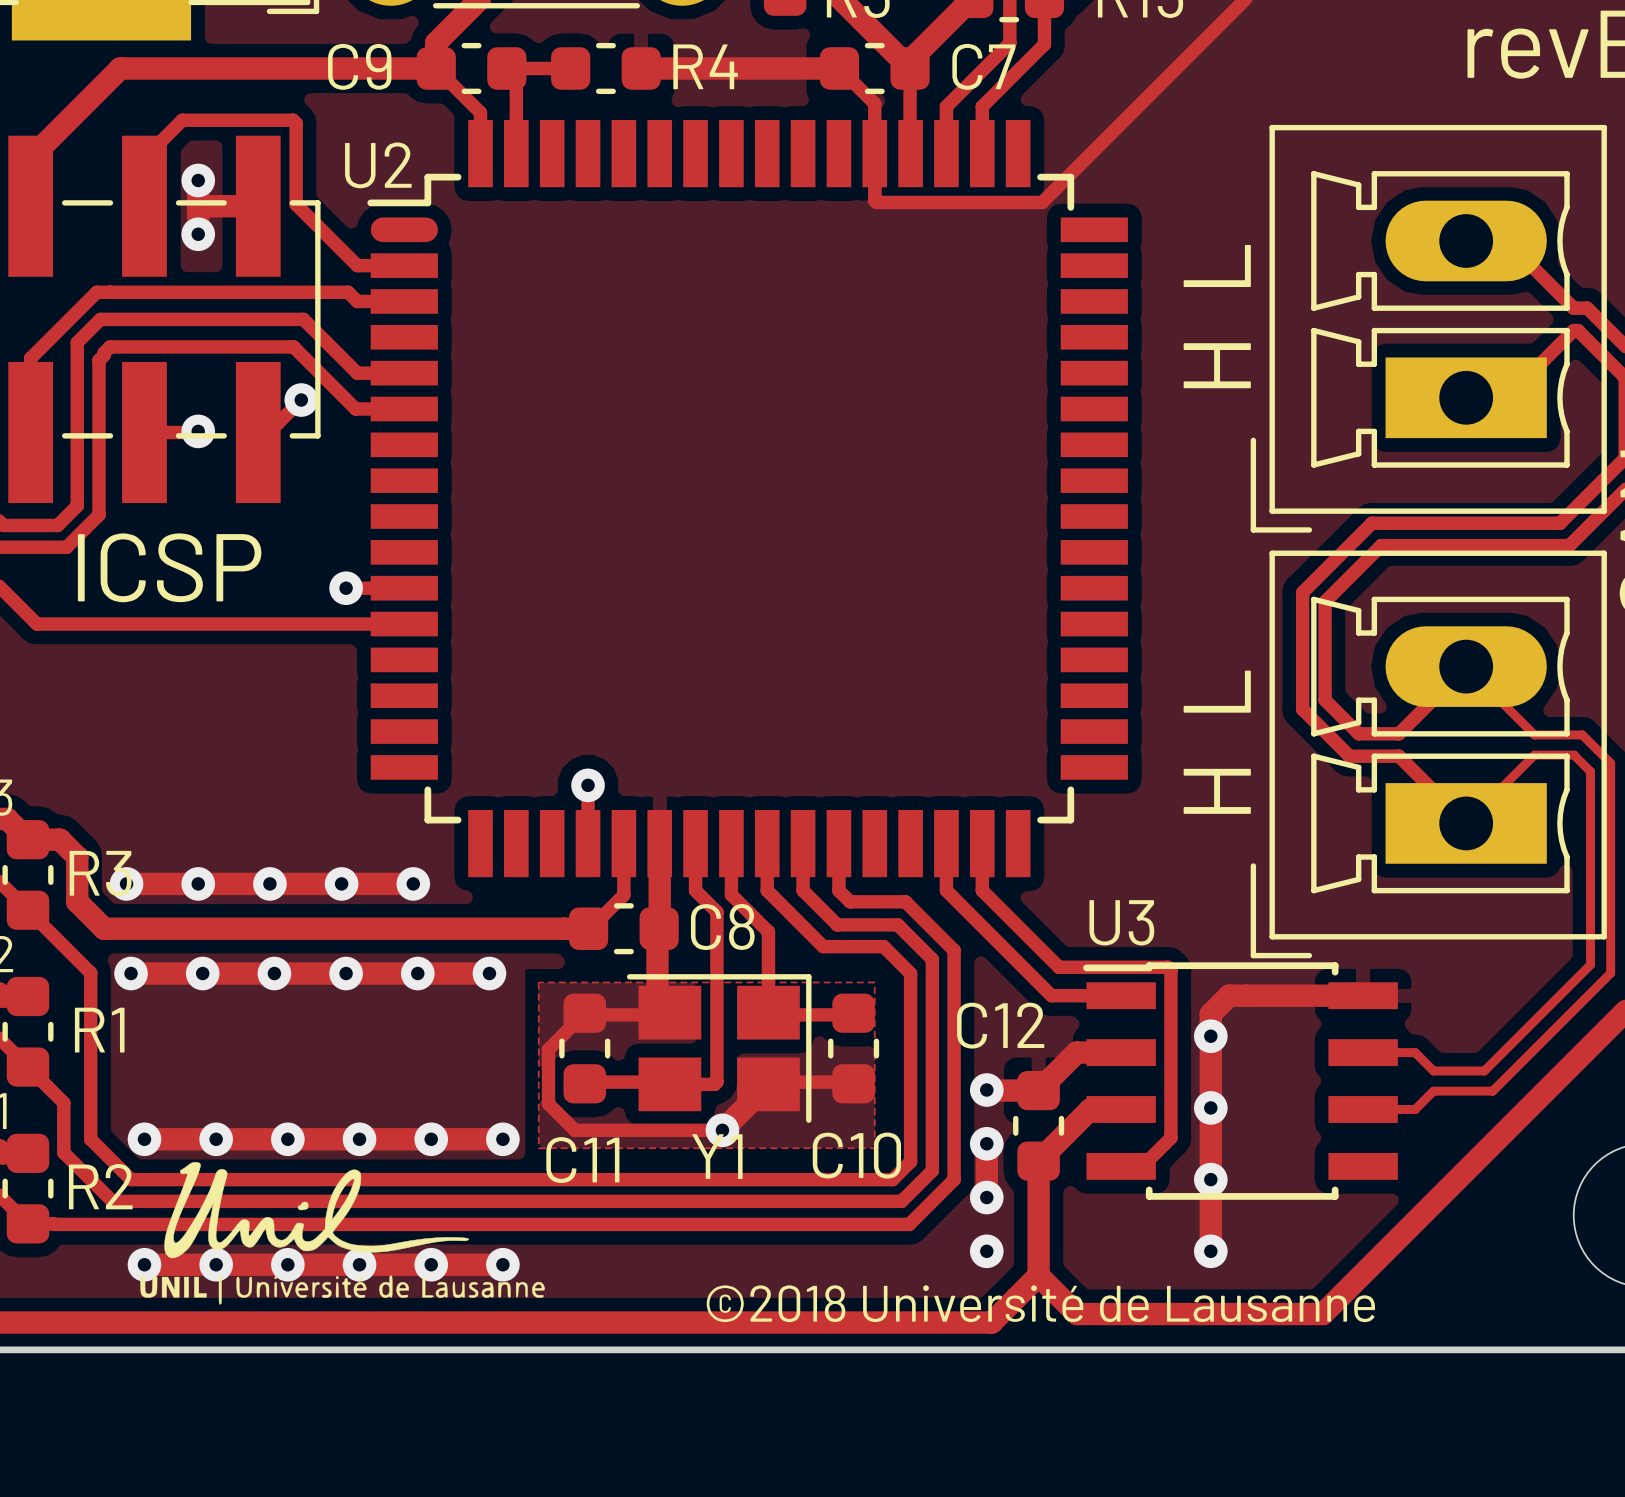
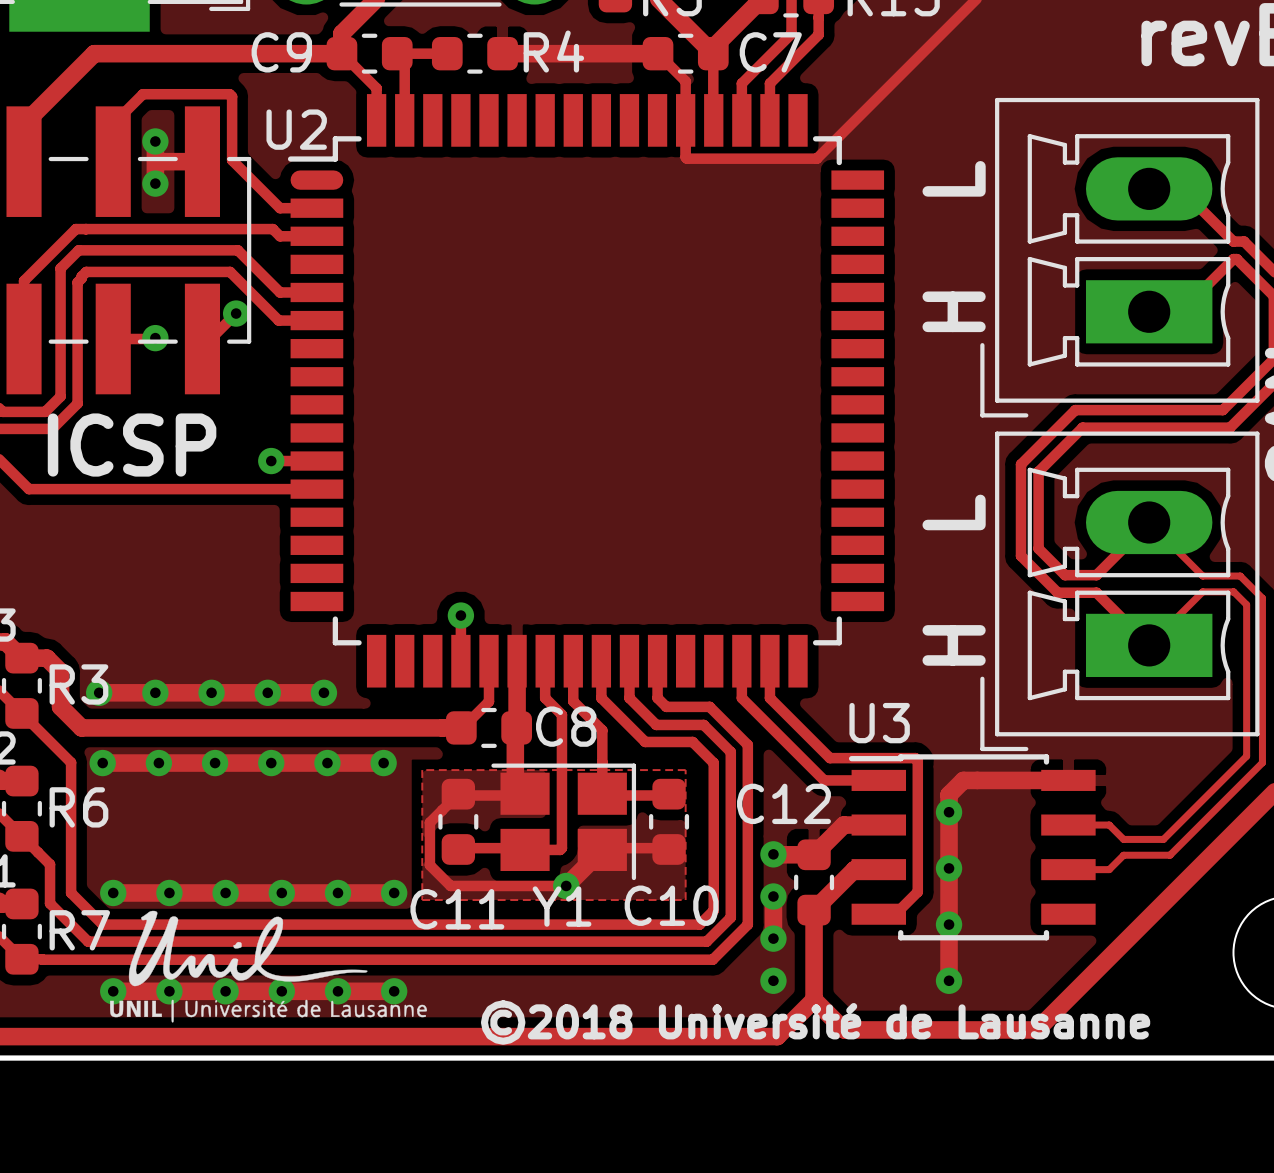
R1 name: R1 (99, 1030) -> R6 (78, 807)
R2 name: R2 (100, 1186) -> R7 (79, 930)

